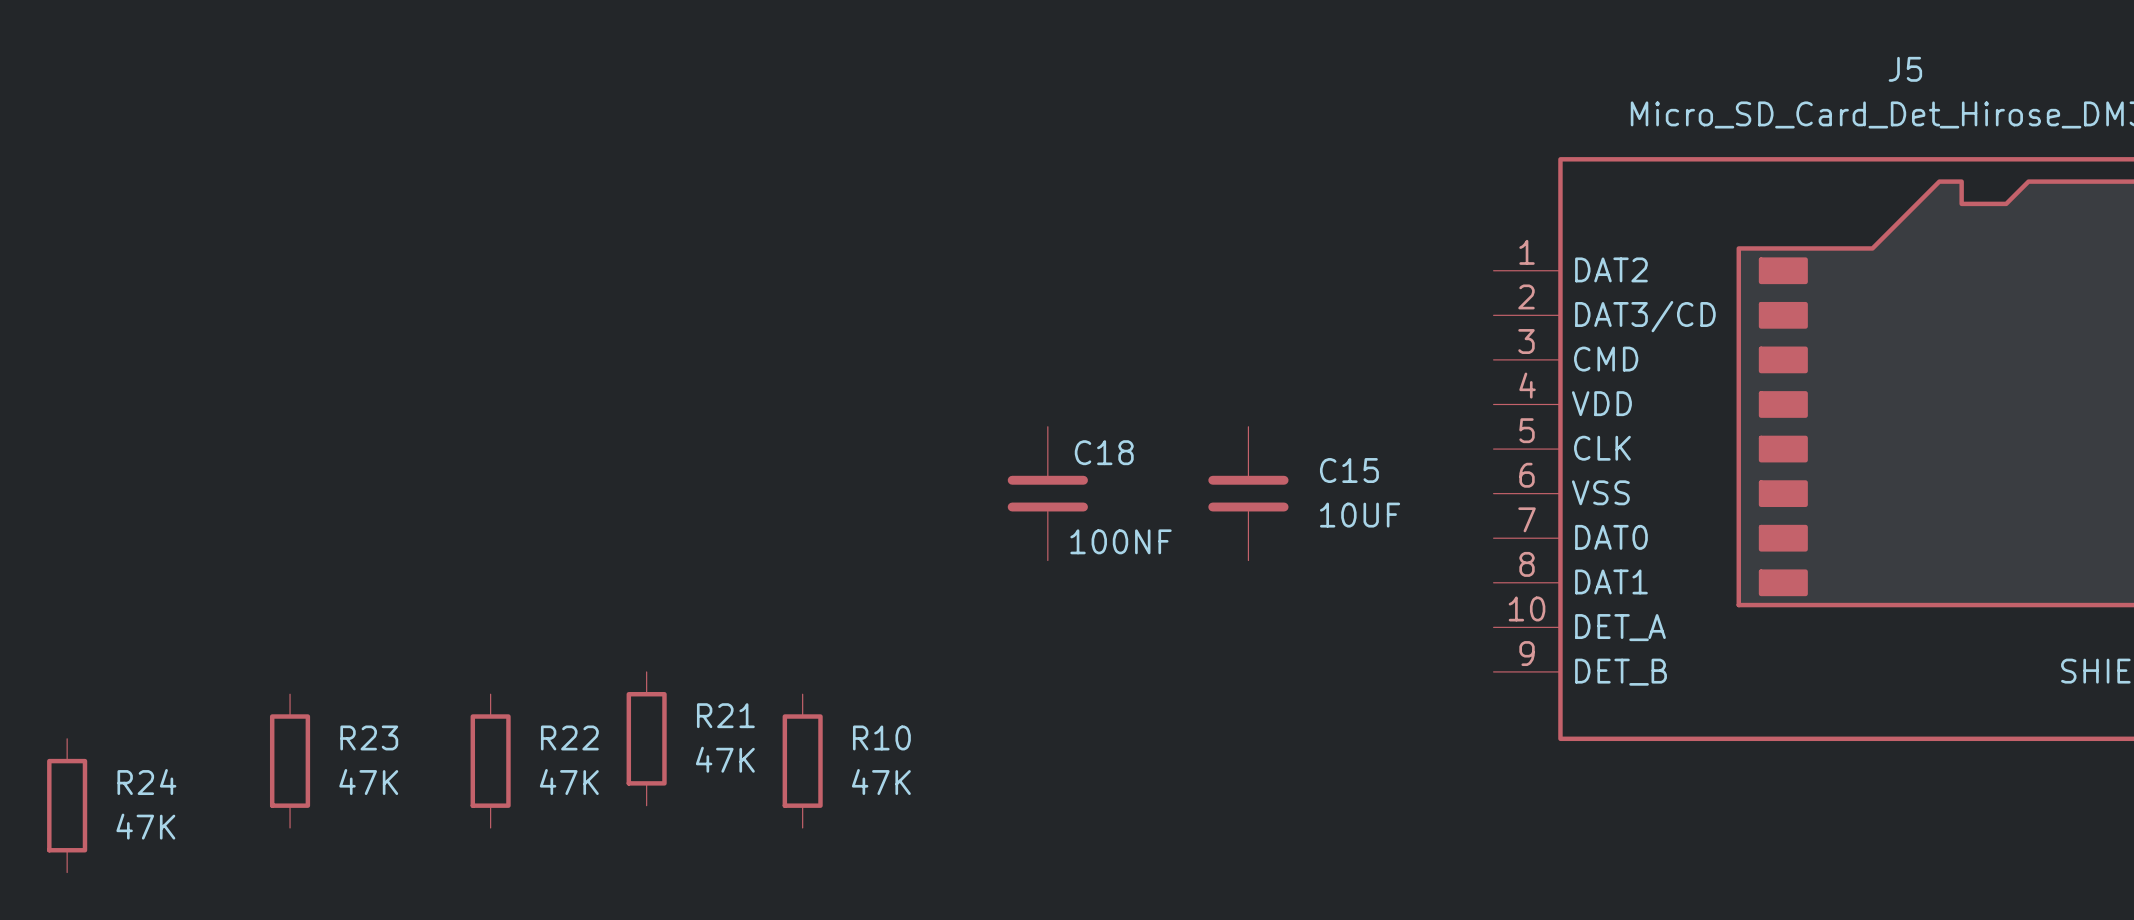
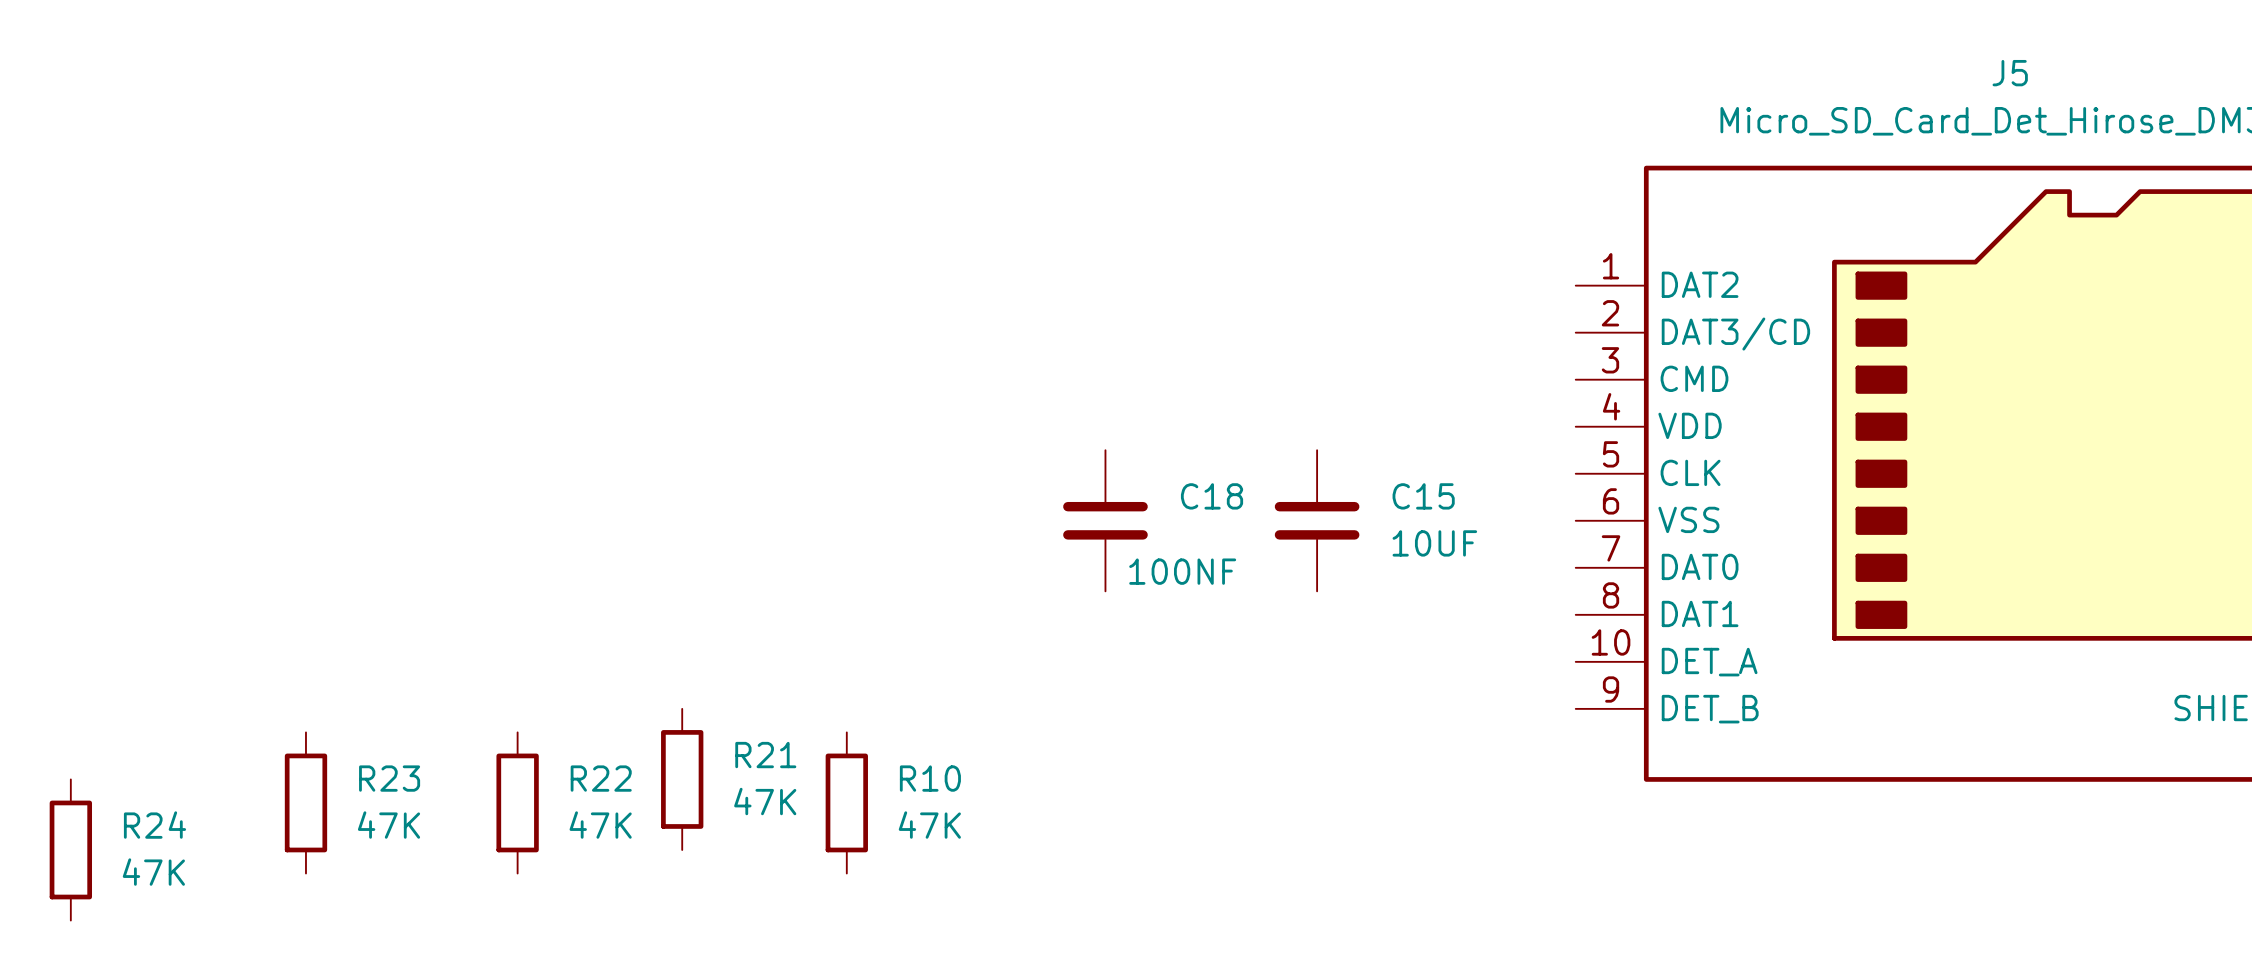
C18 name position: C18 (1104, 452) -> C18 (1212, 496)

